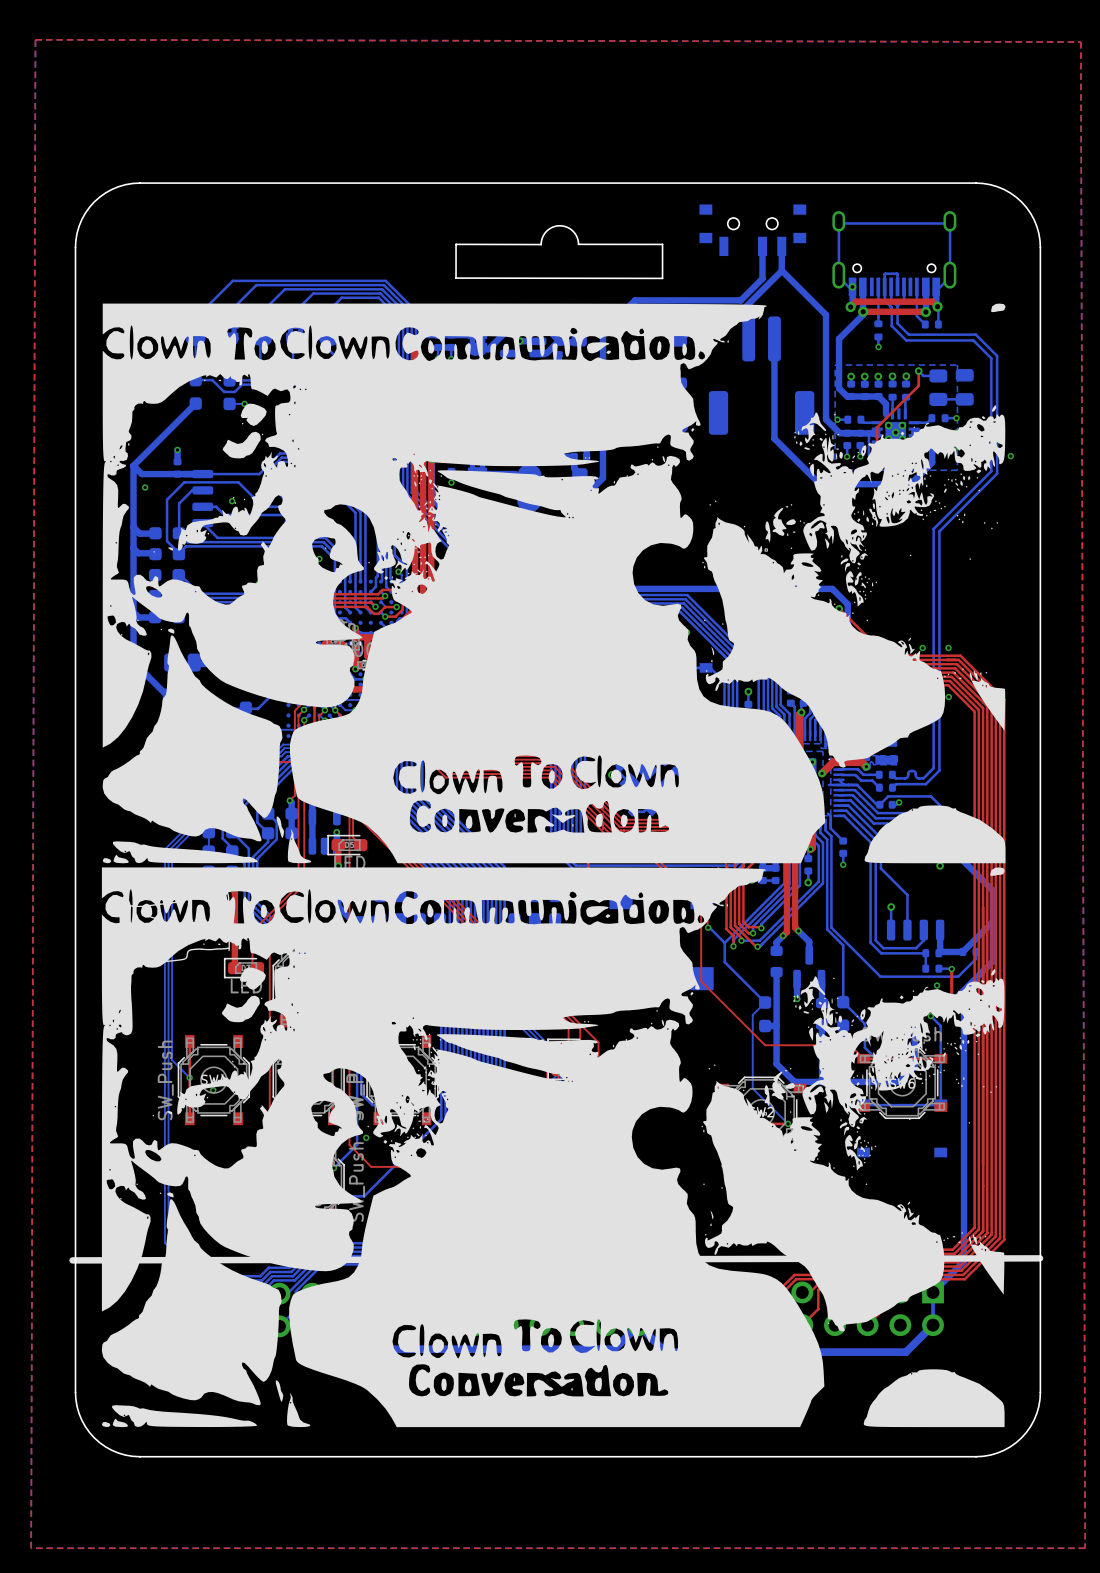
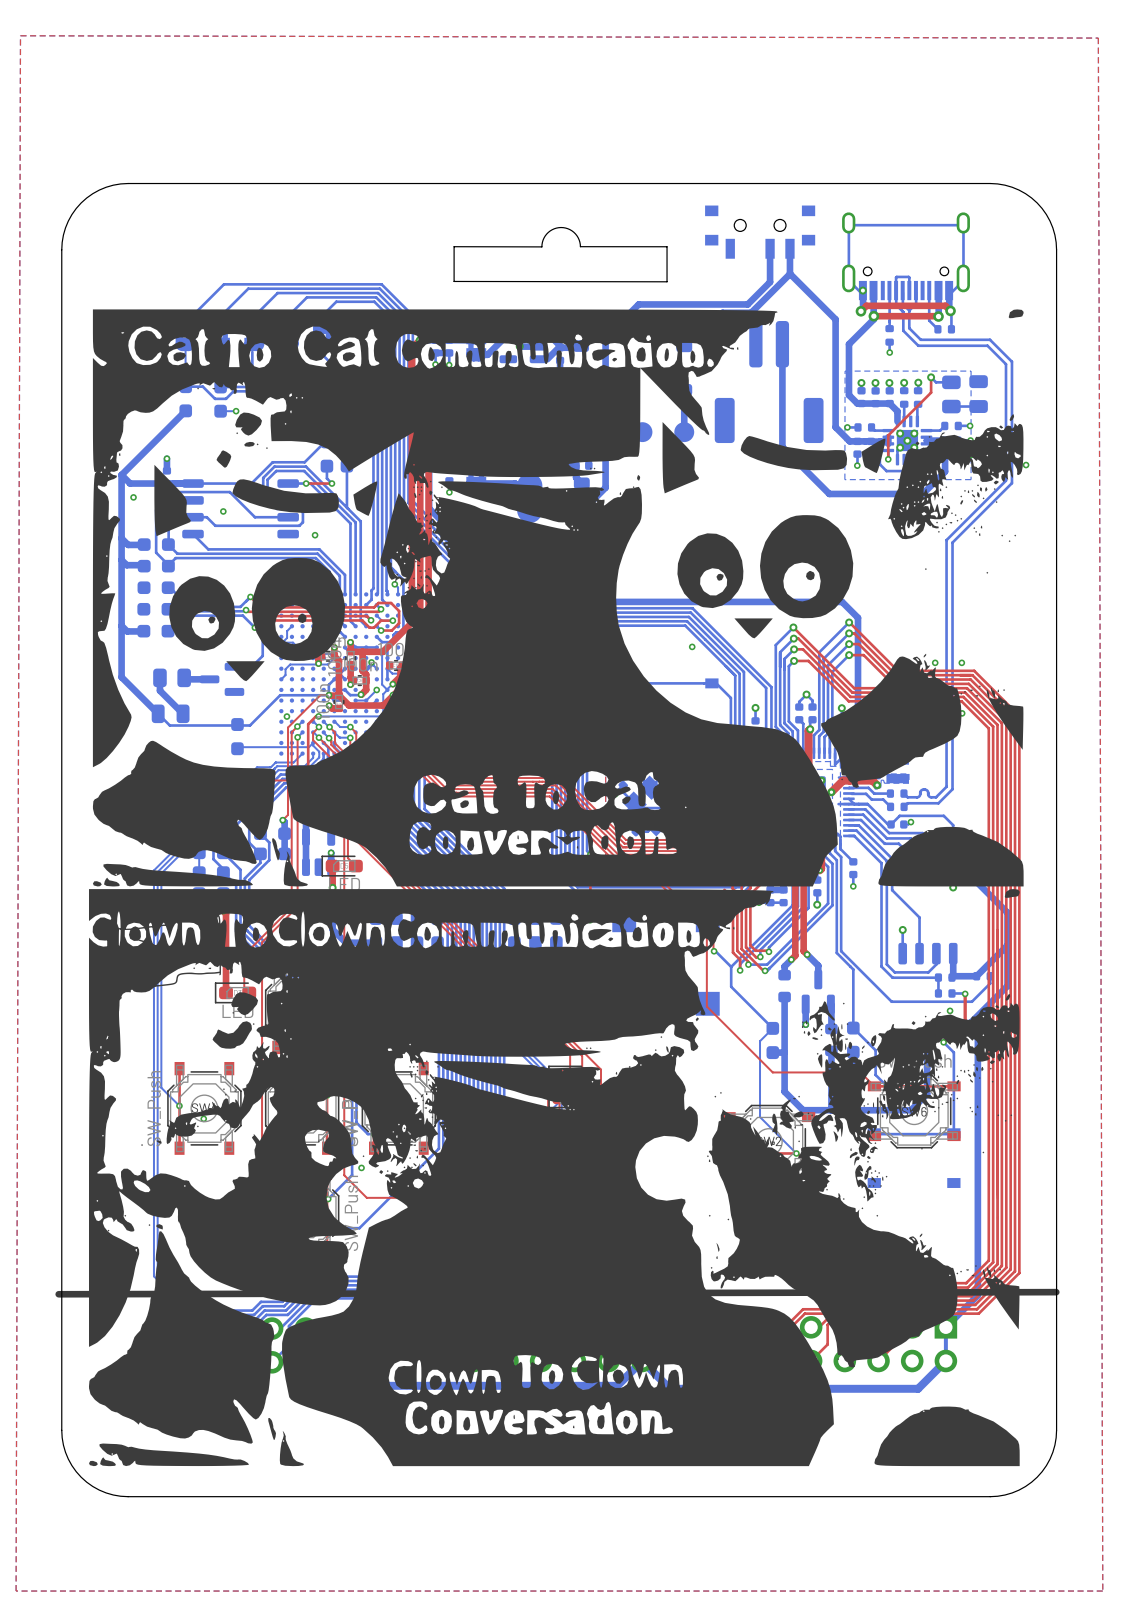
part footprint: [102, 303, 1006, 864] -> [92, 309, 1024, 887]

